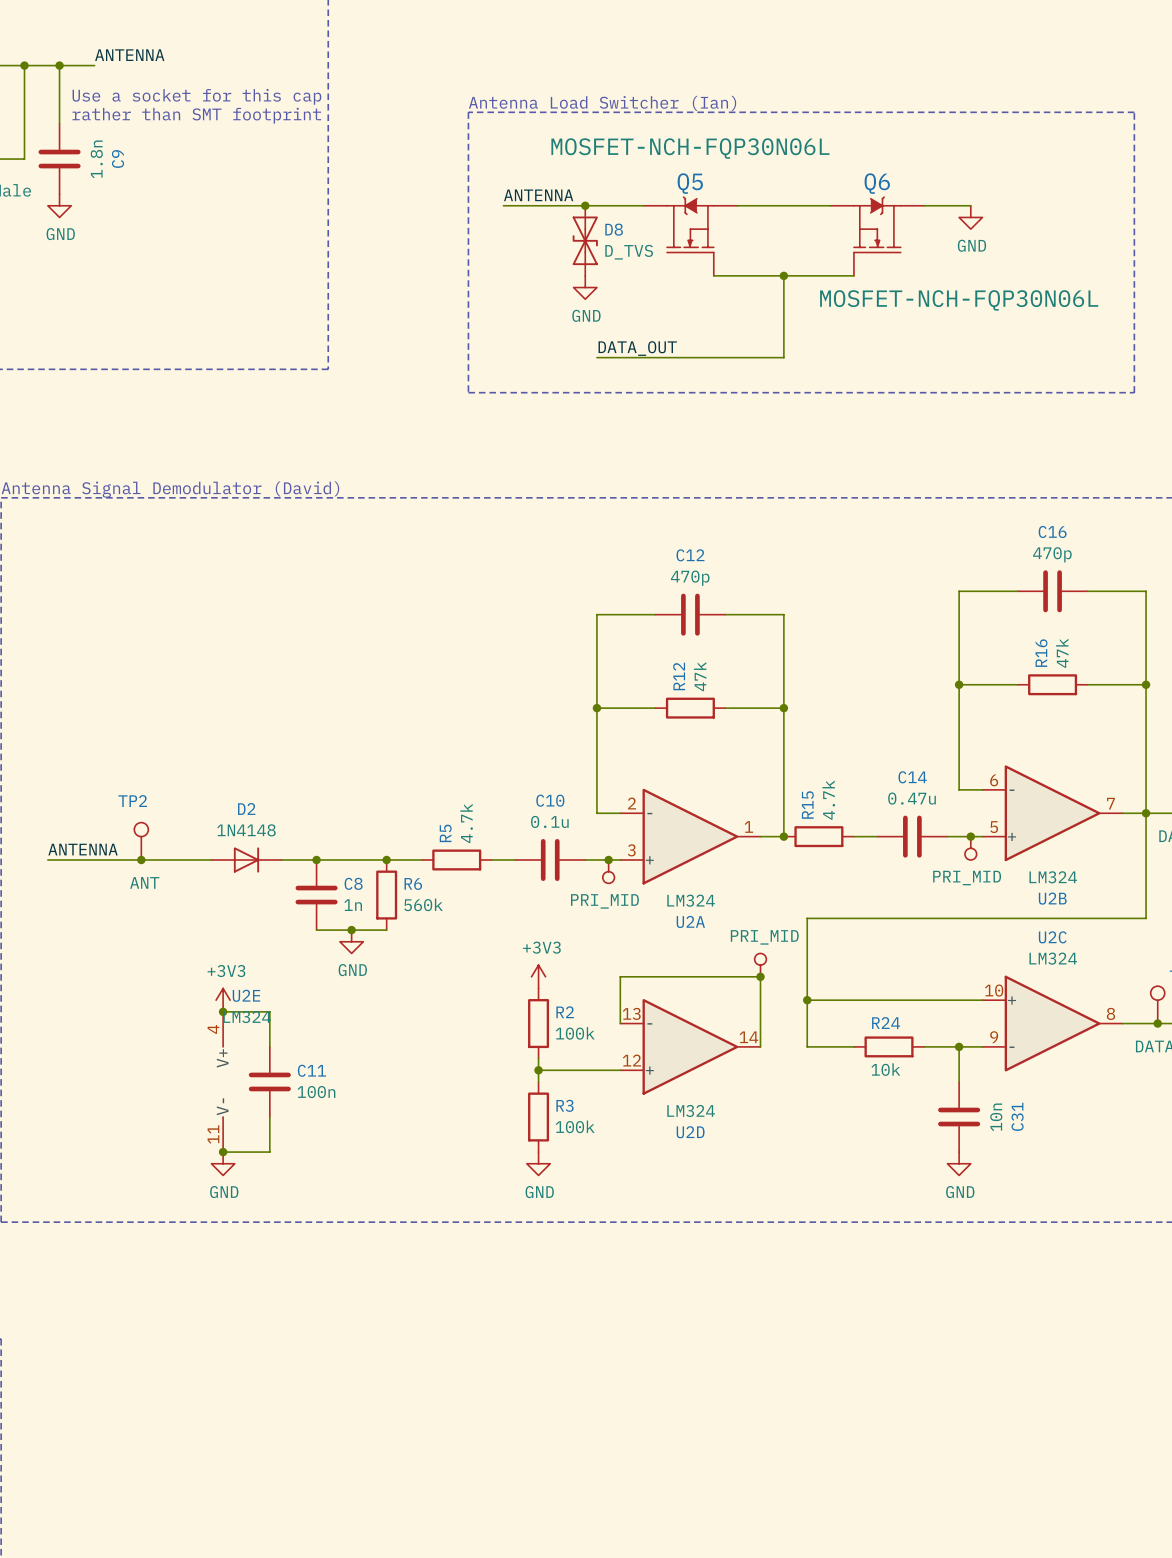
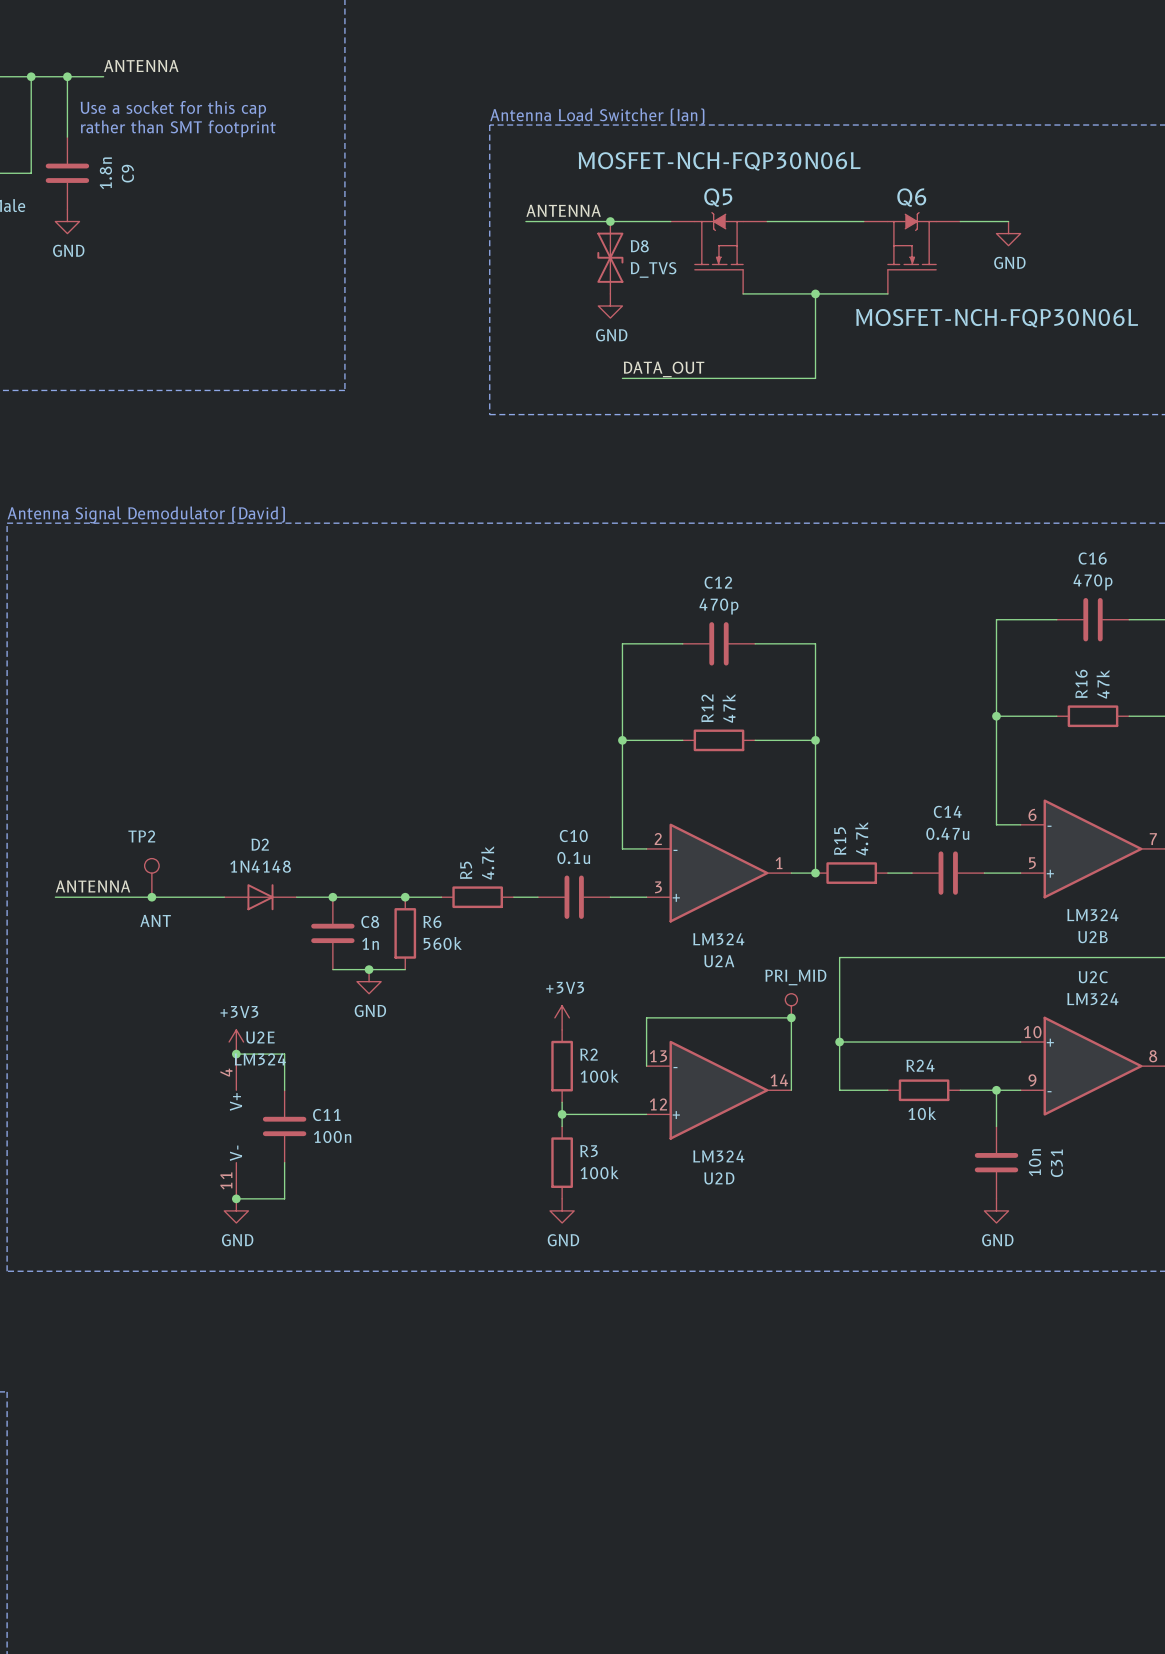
junction: (970, 836) -> none
power symbol: PRI_MID (970, 848) -> none
junction: (608, 859) -> none
power symbol: PRI_MID (608, 871) -> none

